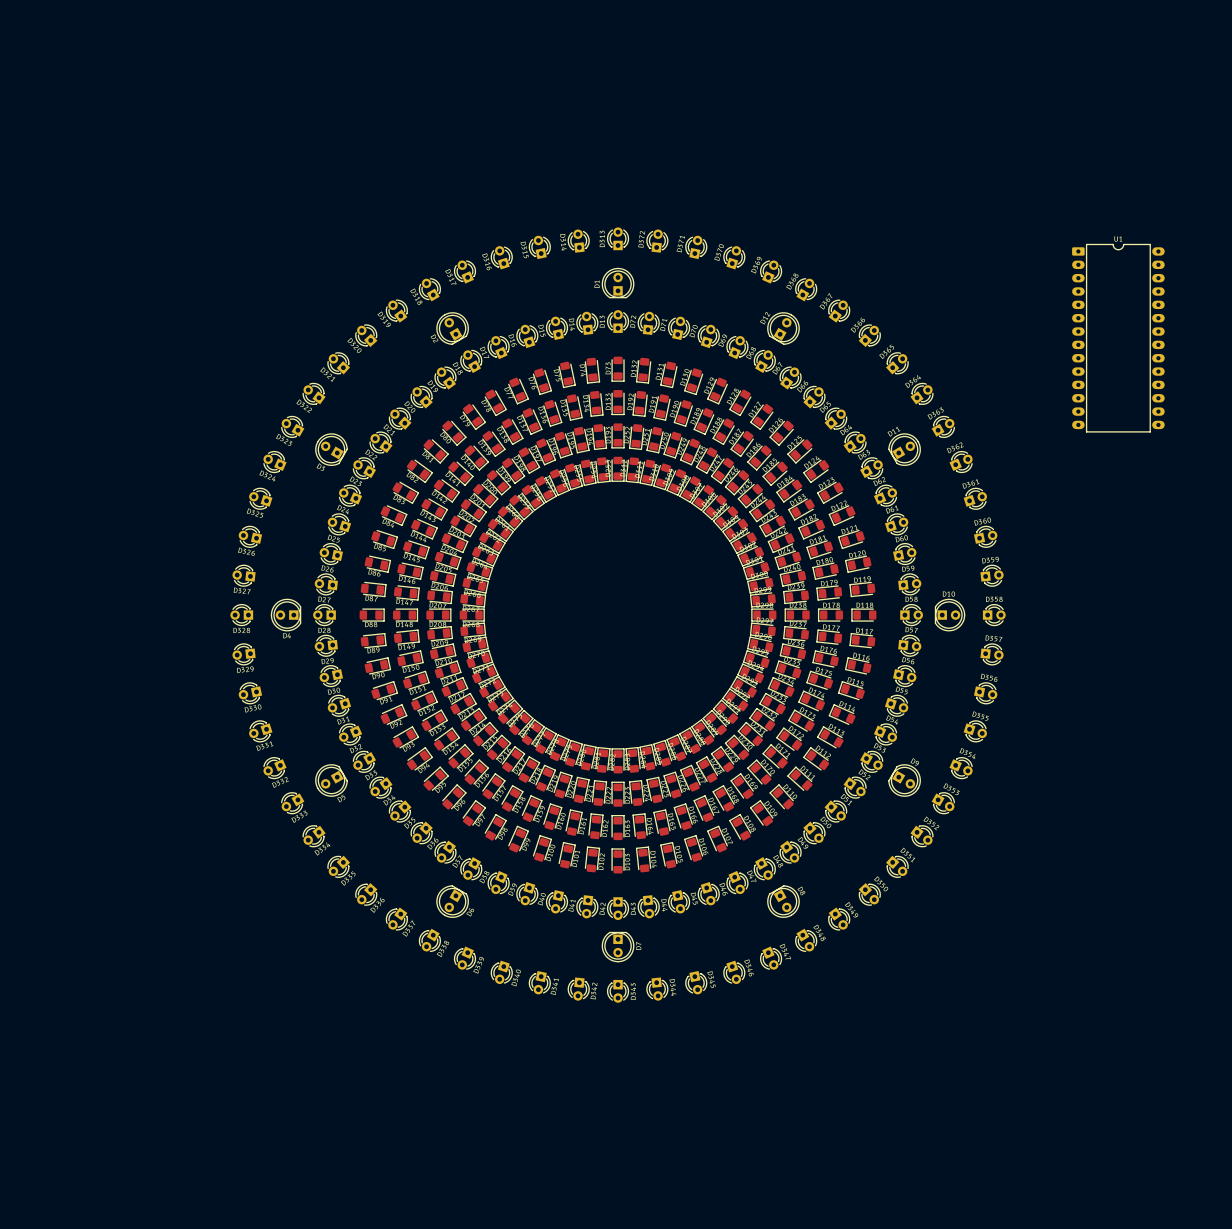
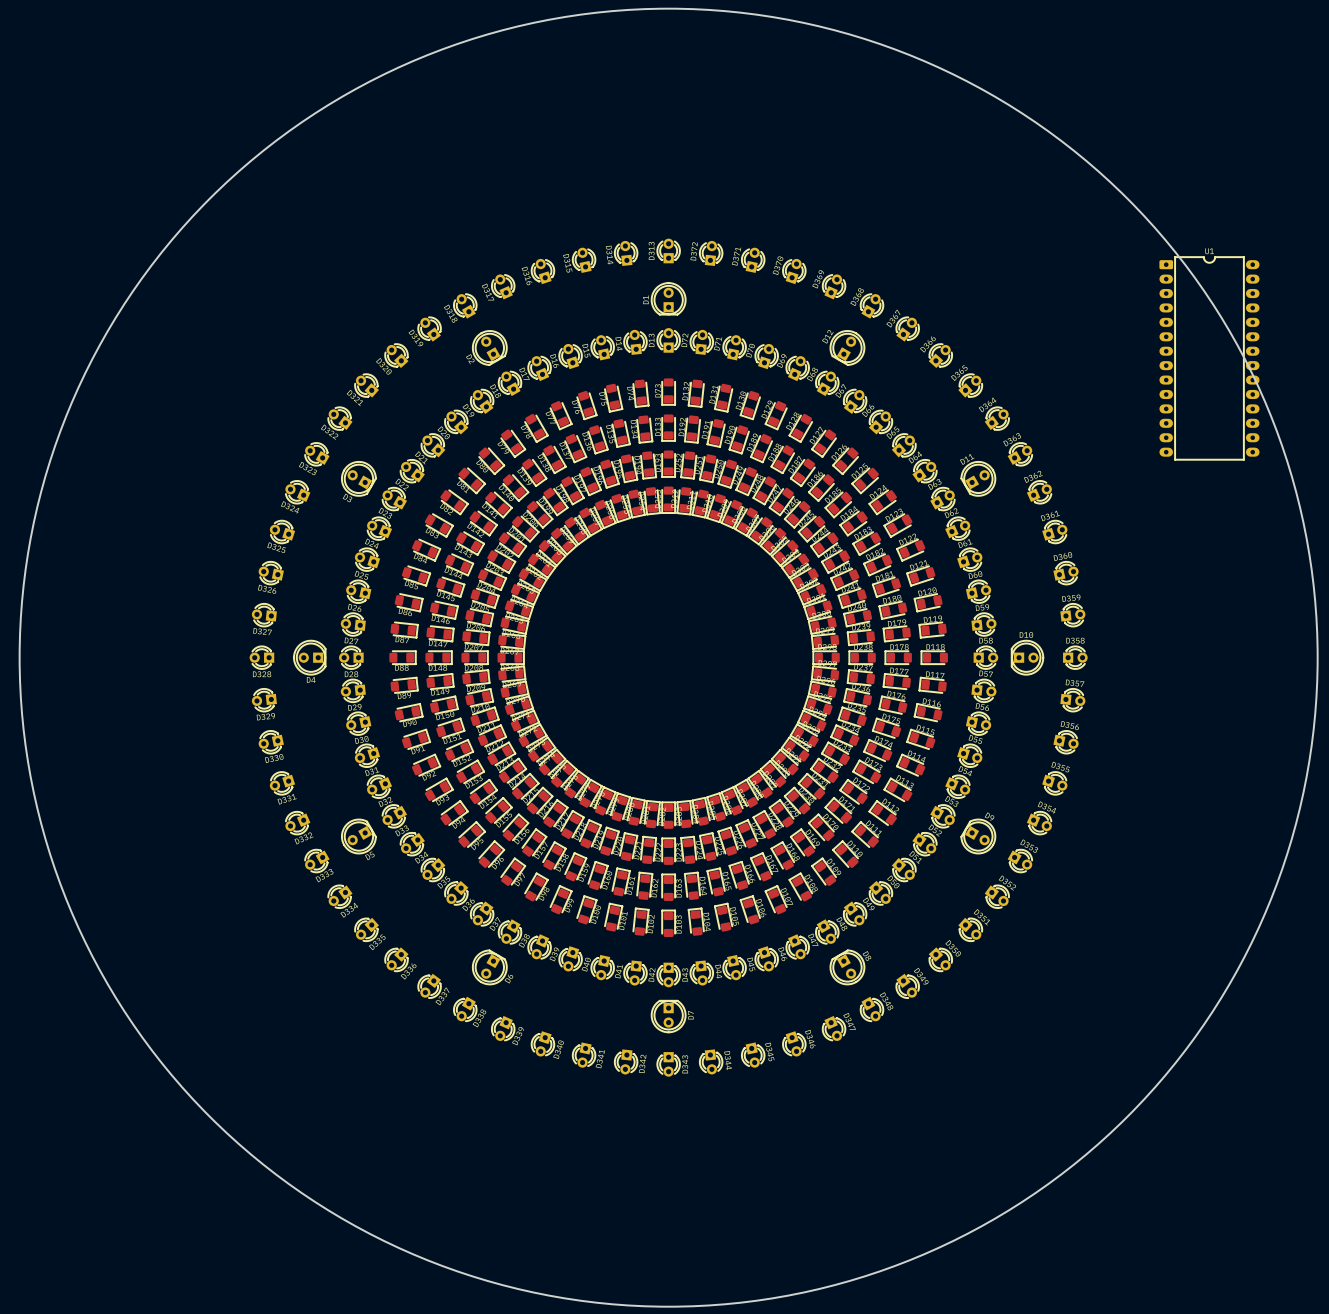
round board edge: none -> [19, 8, 1318, 1307]

